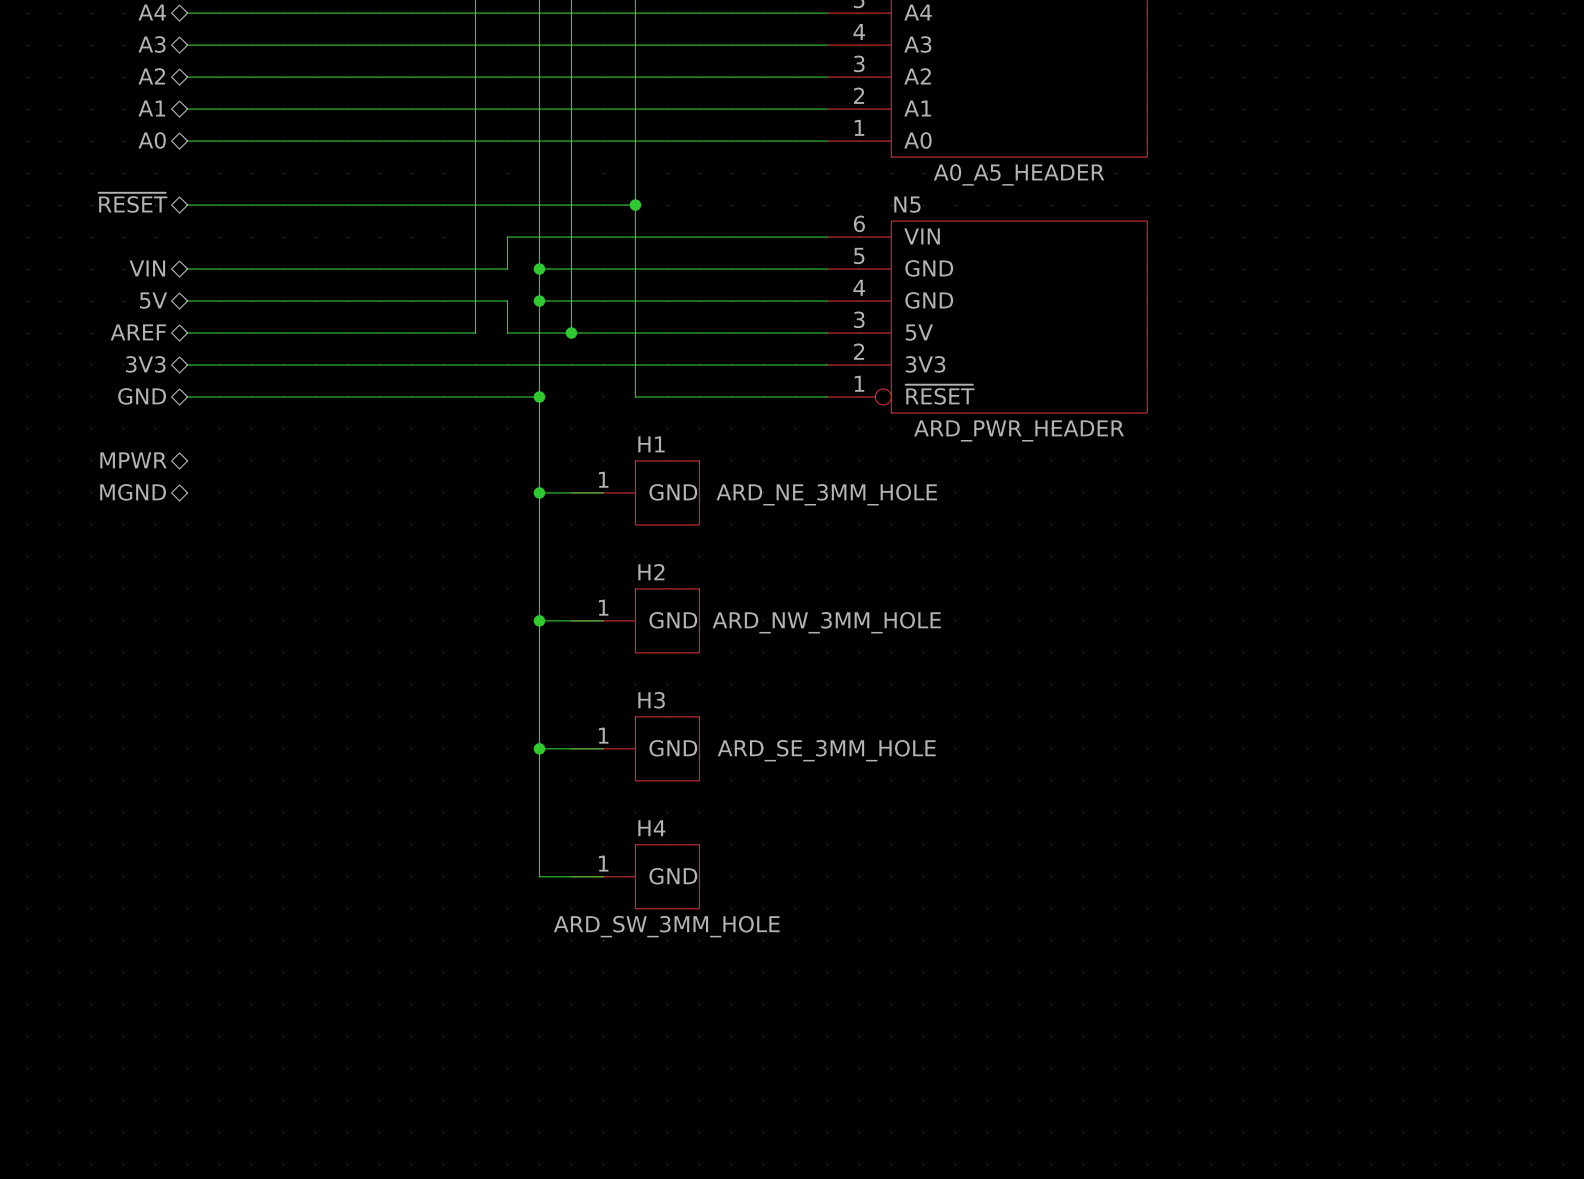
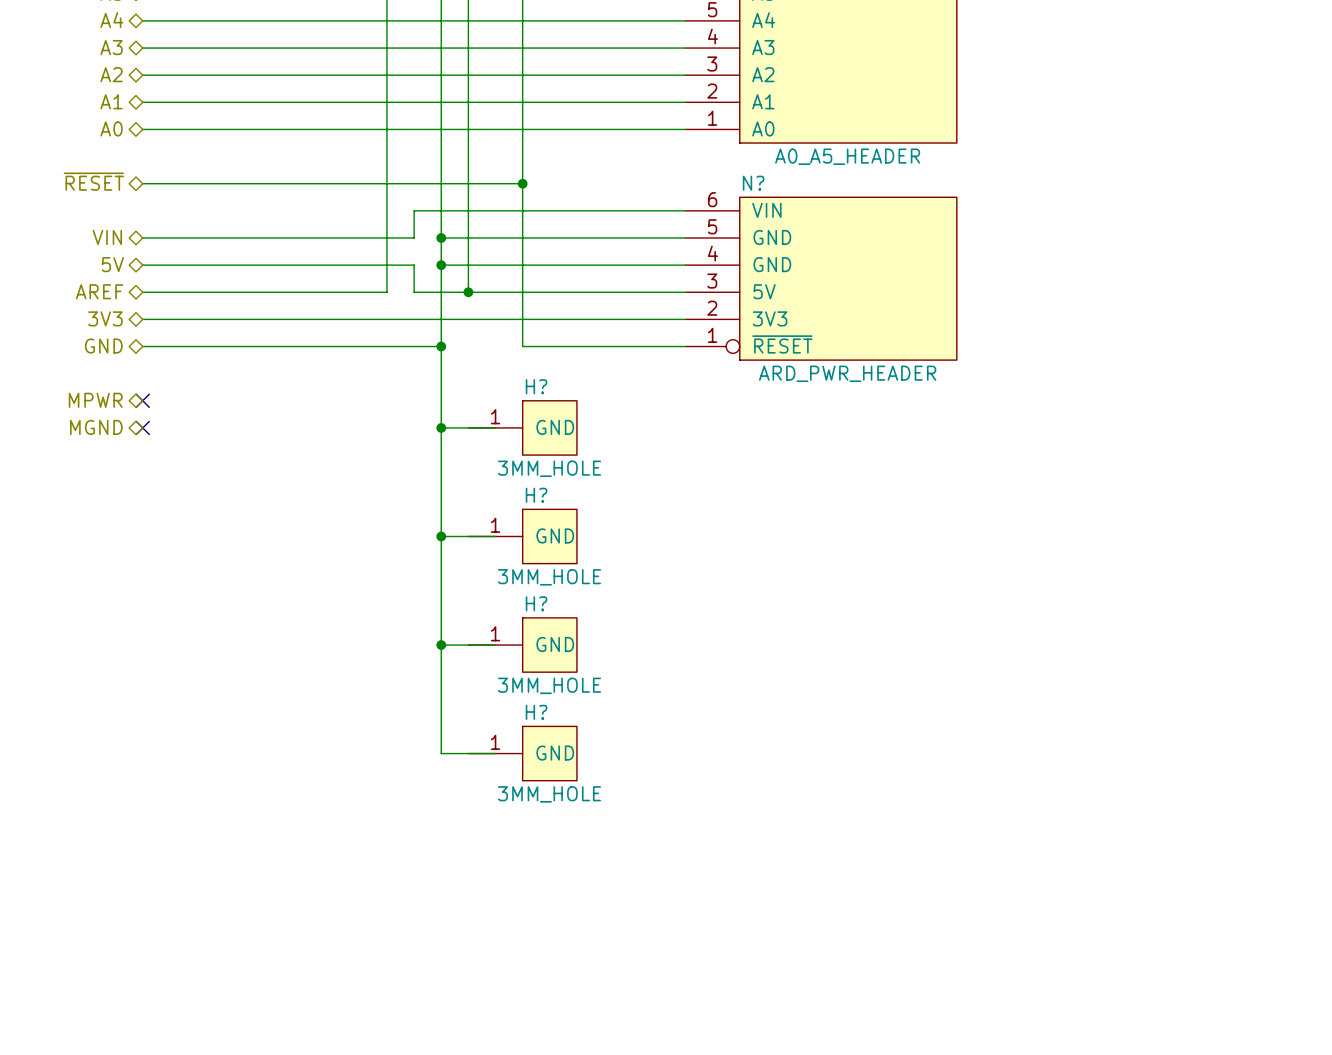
N5 name: N5 (907, 204) -> N? (753, 183)
H1 name: H1 (651, 444) -> H? (536, 386)
no-connect mark: none -> (142, 400)
no-connect mark: none -> (142, 427)
H1 value: ARD_NE_3MM_HOLE (826, 494) -> 3MM_HOLE (549, 468)
H2 name: H2 (651, 572) -> H? (536, 495)
H2 value: ARD_NW_3MM_HOLE (826, 622) -> 3MM_HOLE (549, 577)
H3 name: H3 (651, 700) -> H? (536, 603)
H3 value: ARD_SE_3MM_HOLE (826, 750) -> 3MM_HOLE (549, 685)
H4 name: H4 (651, 828) -> H? (536, 712)
H4 value: ARD_SW_3MM_HOLE (666, 926) -> 3MM_HOLE (549, 794)

